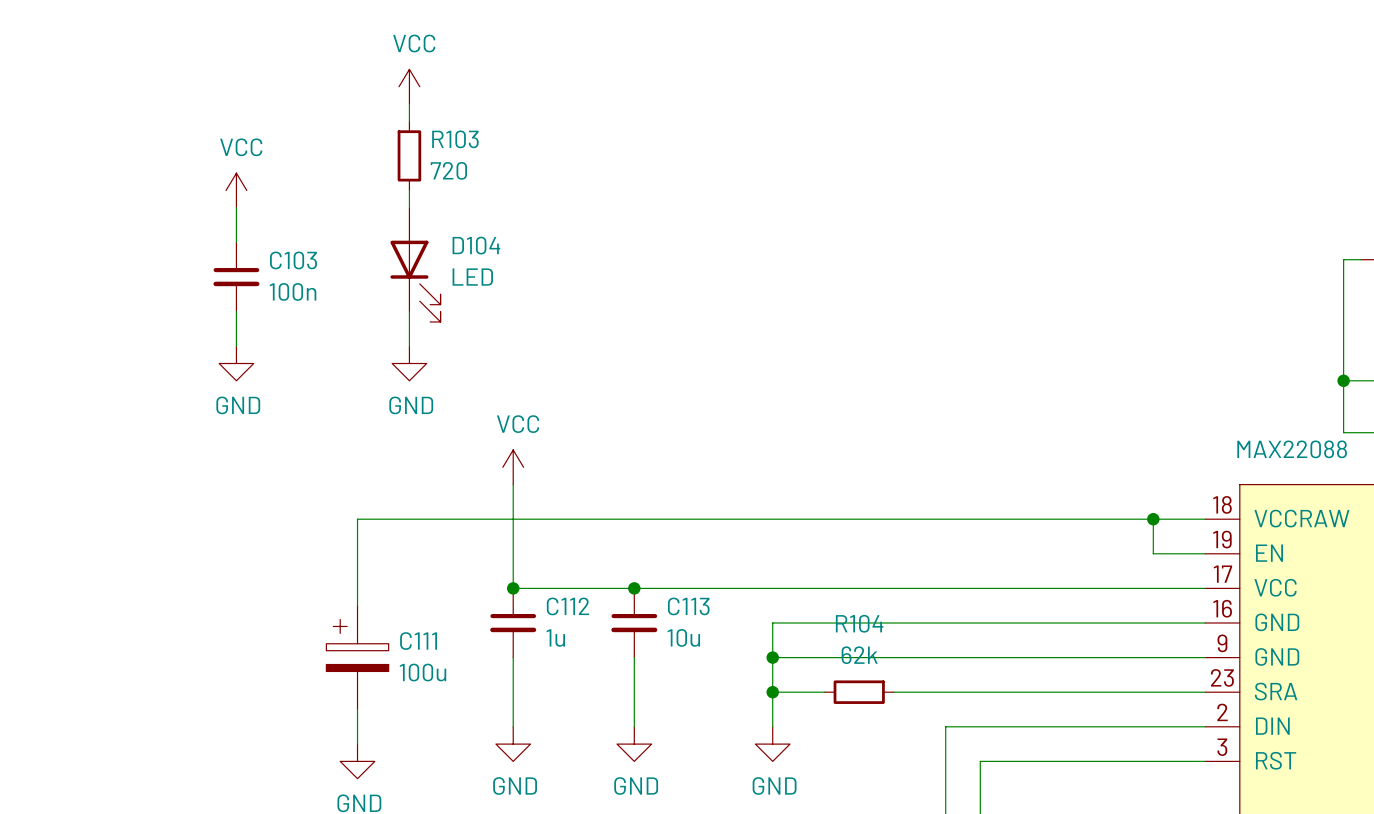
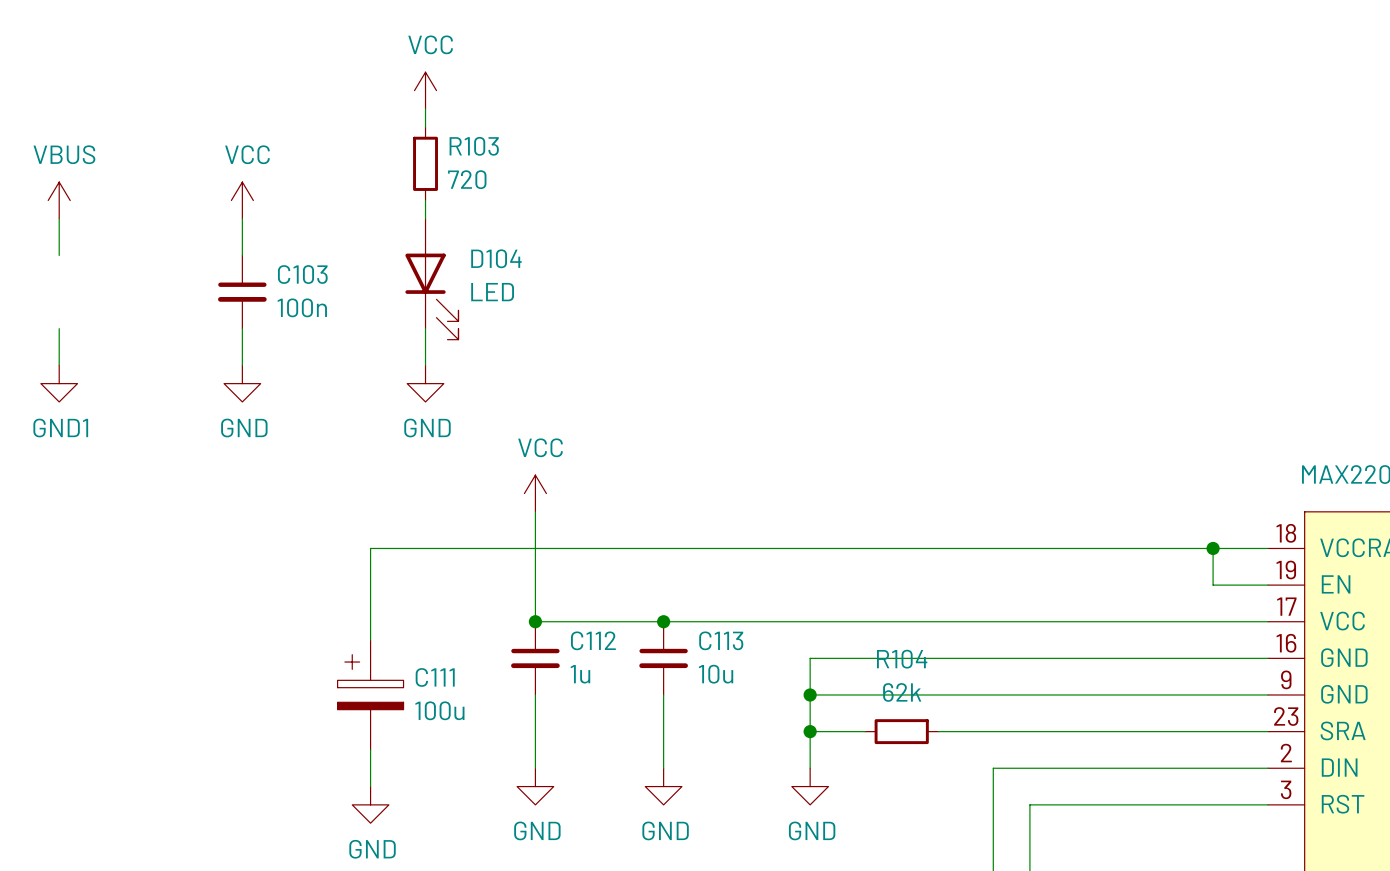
power symbol: none -> VBUS (59, 200)
wire: none -> (59, 218) (59, 255)
wire: none -> (59, 328) (59, 365)
power symbol: none -> GND1 (59, 383)

